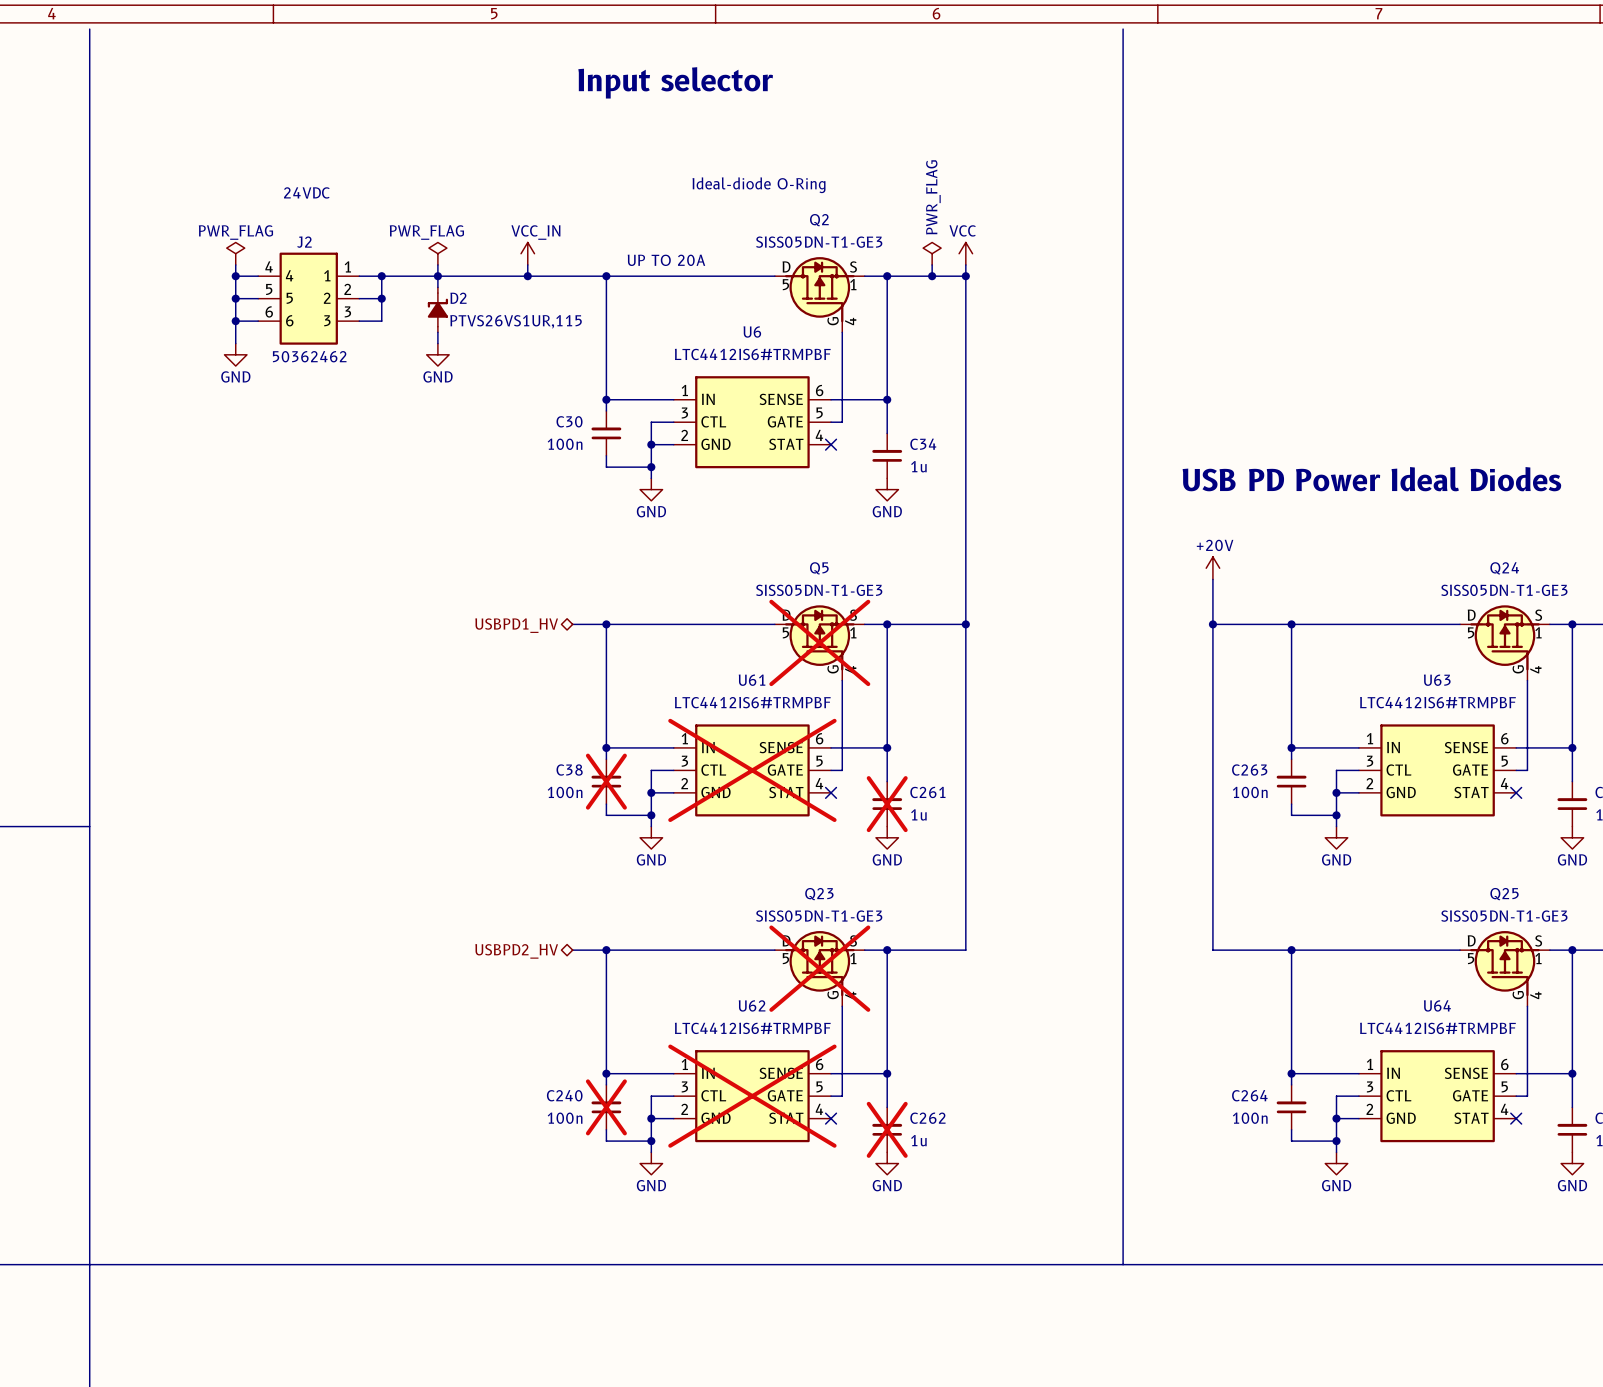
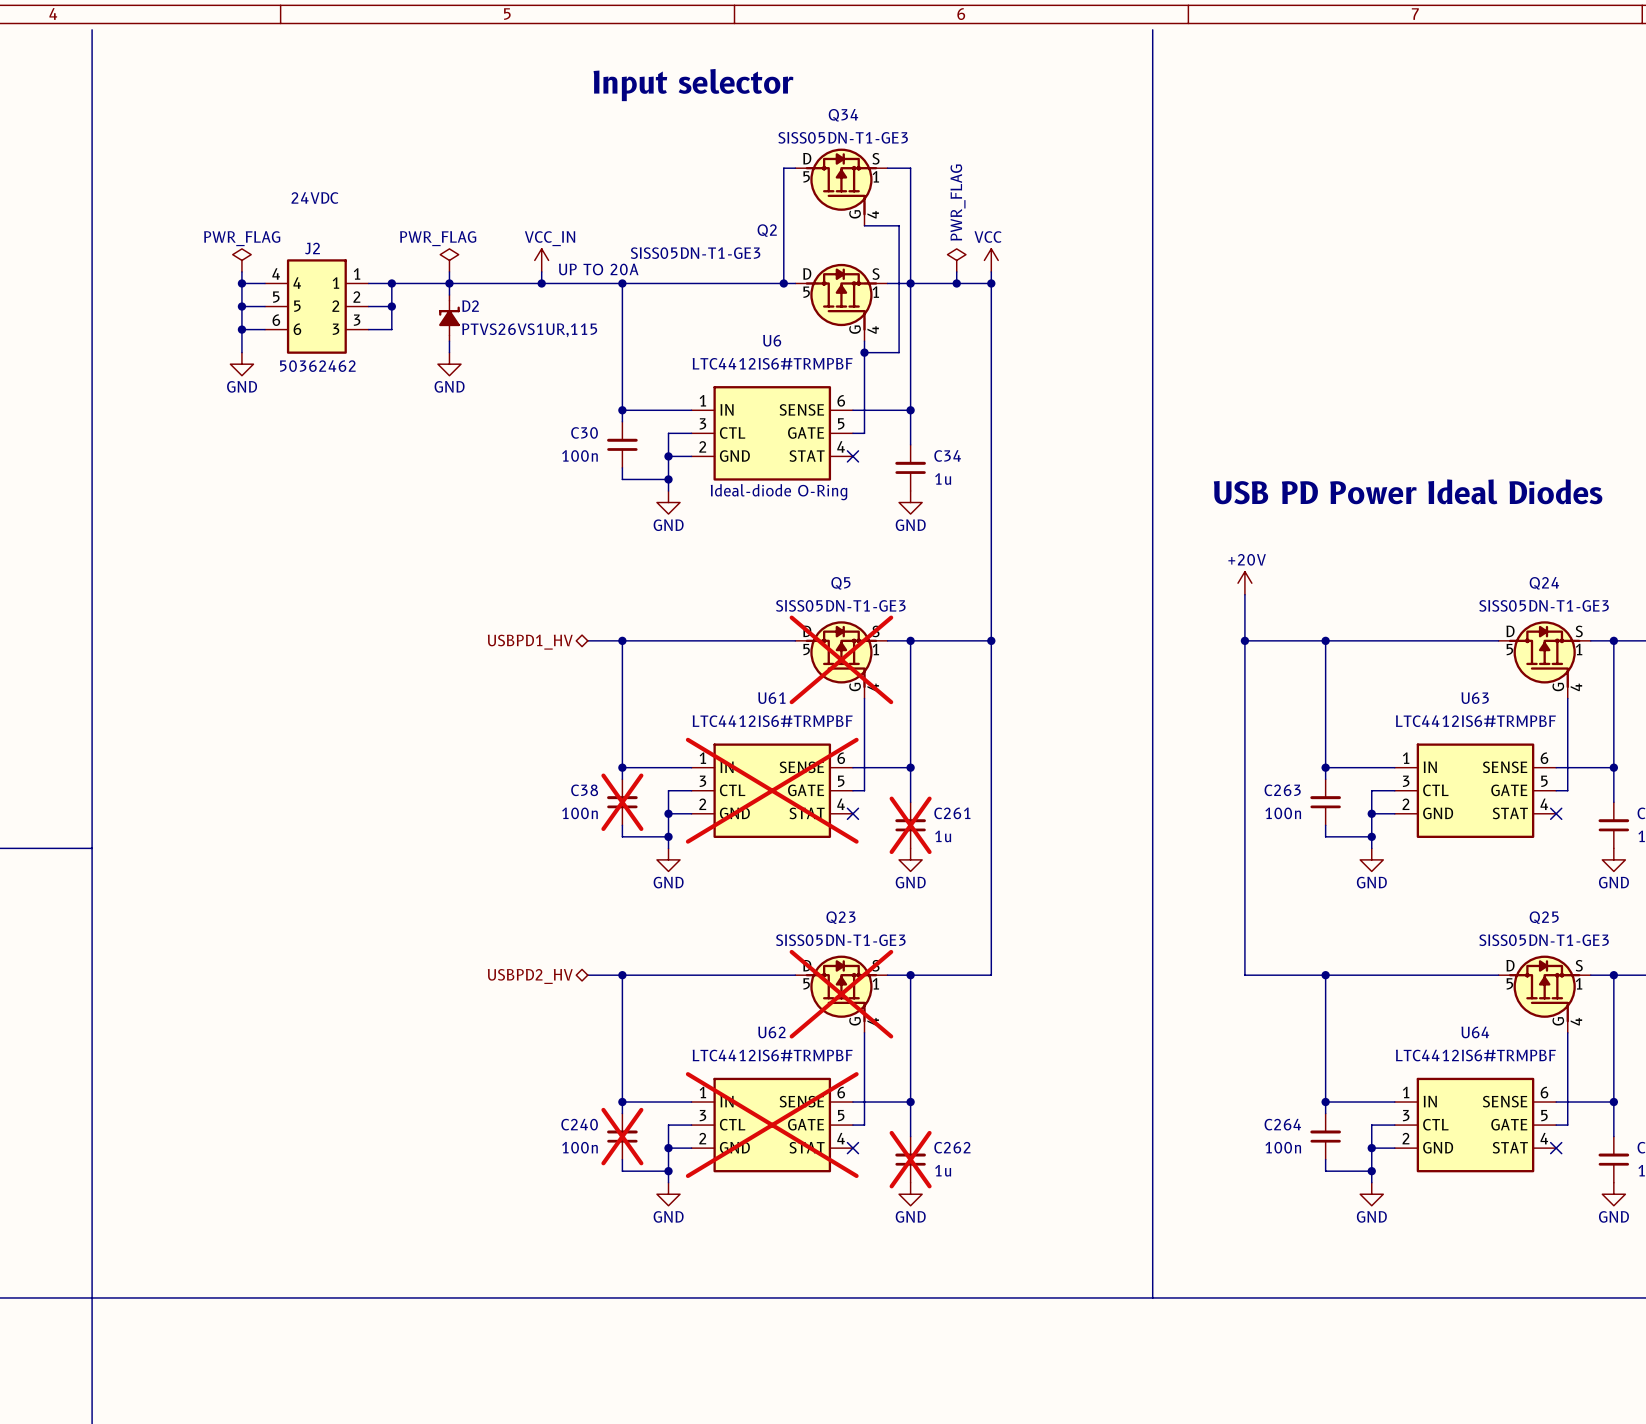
wire: none -> (795, 168) (783, 168) (783, 283)
wire: none -> (887, 168) (910, 168) (910, 283)
Q34: none -> (841, 187)
text: Ideal-diode O-Ring (759, 185) -> none
Q2 name position: Q2 (819, 220) -> Q2 (767, 230)
wire: none -> (864, 225) (899, 225) (899, 352) (864, 352)
Q2 text position: SISS05DN-T1-GE3 (819, 242) -> SISS05DN-T1-GE3 (695, 253)
text position: UP TO 20A (666, 260) -> UP TO 20A (598, 269)
junction: none -> (783, 283)
junction: none -> (864, 352)
text: none -> Ideal-diode O-Ring (779, 492)

